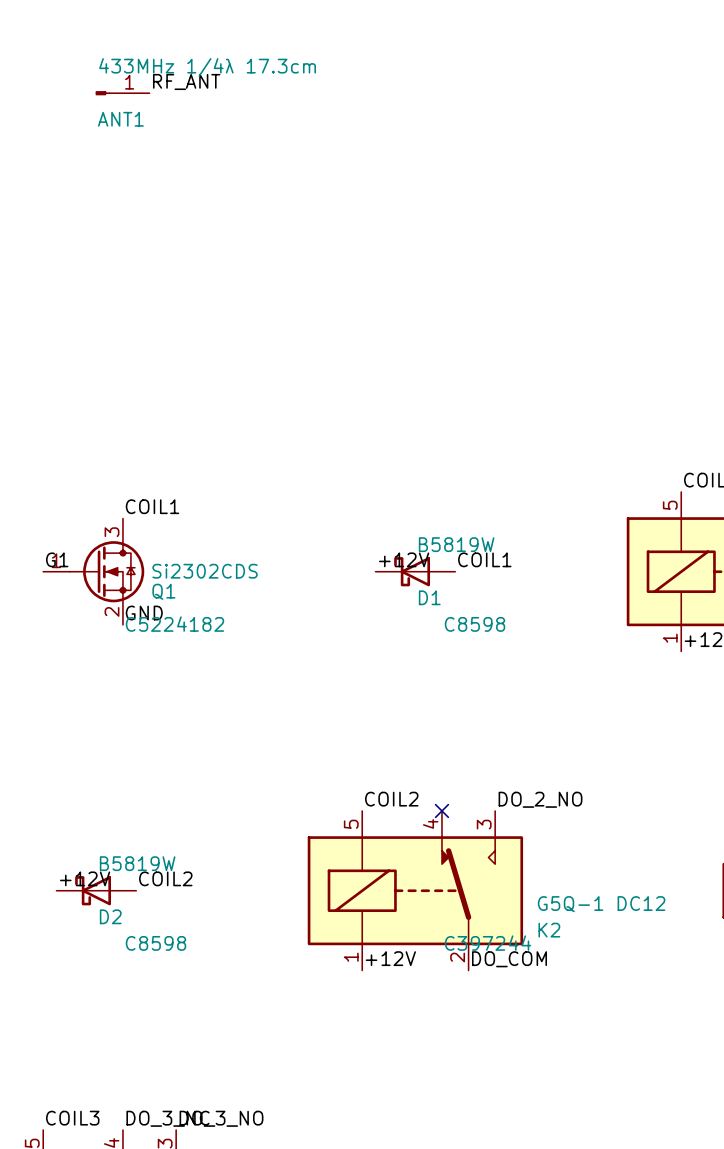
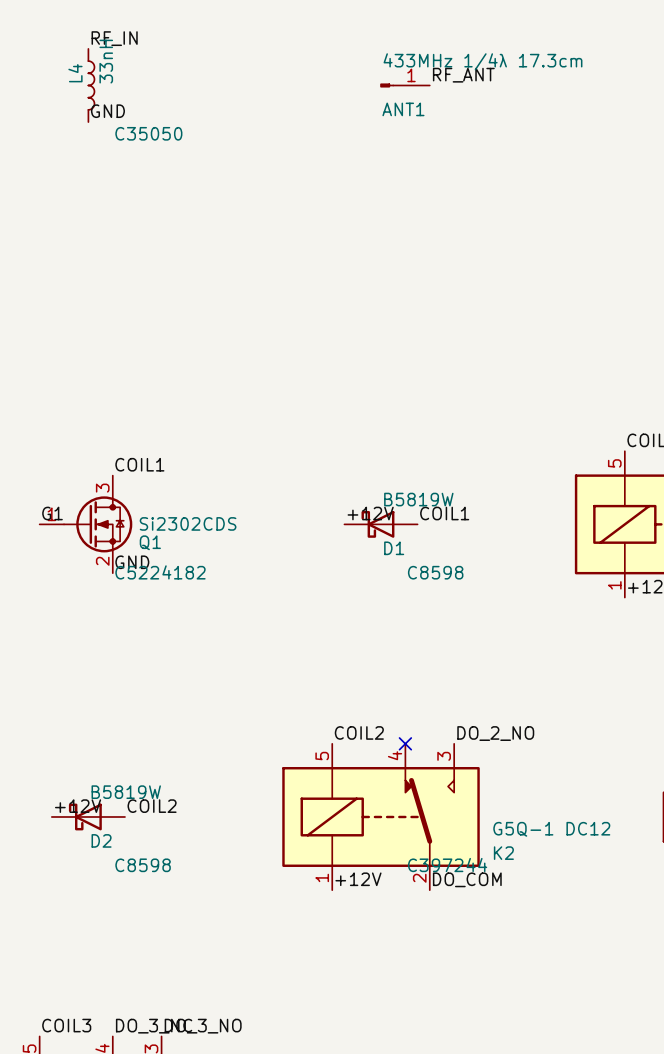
label: none -> RF_IN (114, 38)
label: RF_ANT (186, 81) -> none
label: none -> RF_ANT (463, 75)
L4: none -> 33nH (91, 85)
ANT1 position: (122, 93) -> (405, 85)
label: none -> GND (107, 111)

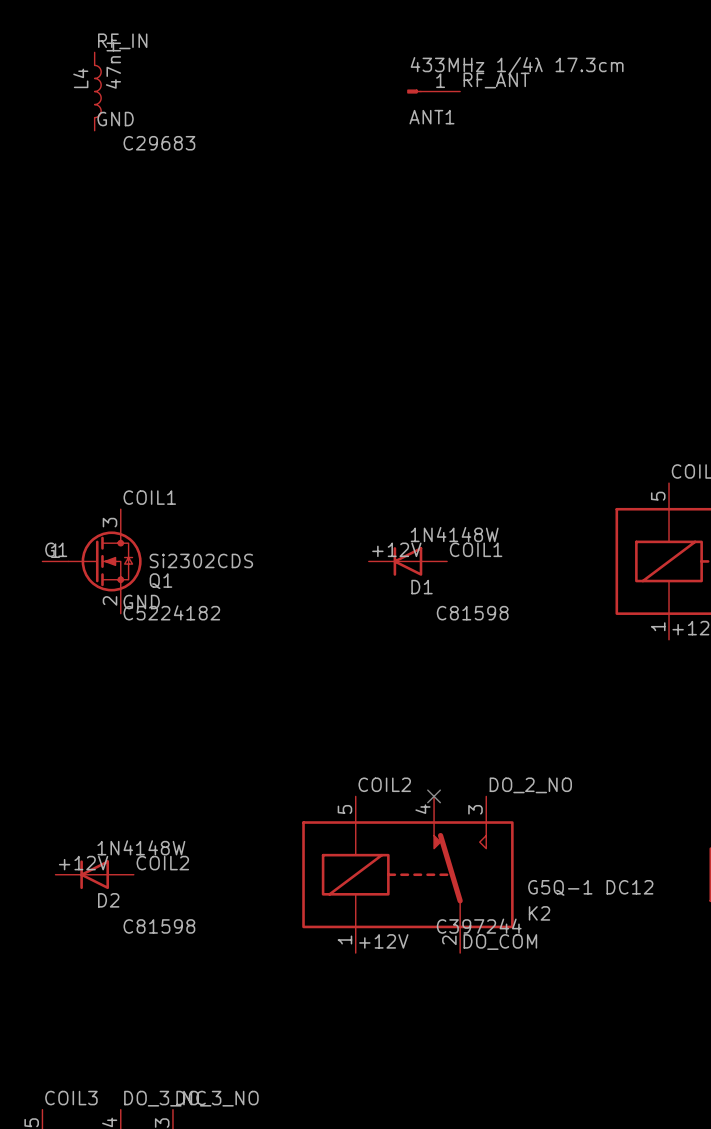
L4 value: 33nH (106, 61) -> 47nH (113, 65)
L4 text: C35050 (148, 133) -> C29683 (159, 143)
D1 value: B5819W (418, 499) -> 1N4148W (454, 534)
D1 symbol: [344, 510, 418, 538] -> [368, 547, 448, 576]
D1 text: C8598 (435, 572) -> C81598 (472, 613)
D2 value: B5819W (126, 792) -> 1N4148W (141, 847)
D2 symbol: [51, 803, 125, 831] -> [55, 860, 134, 890]
D2 text: C8598 (143, 865) -> C81598 (159, 926)

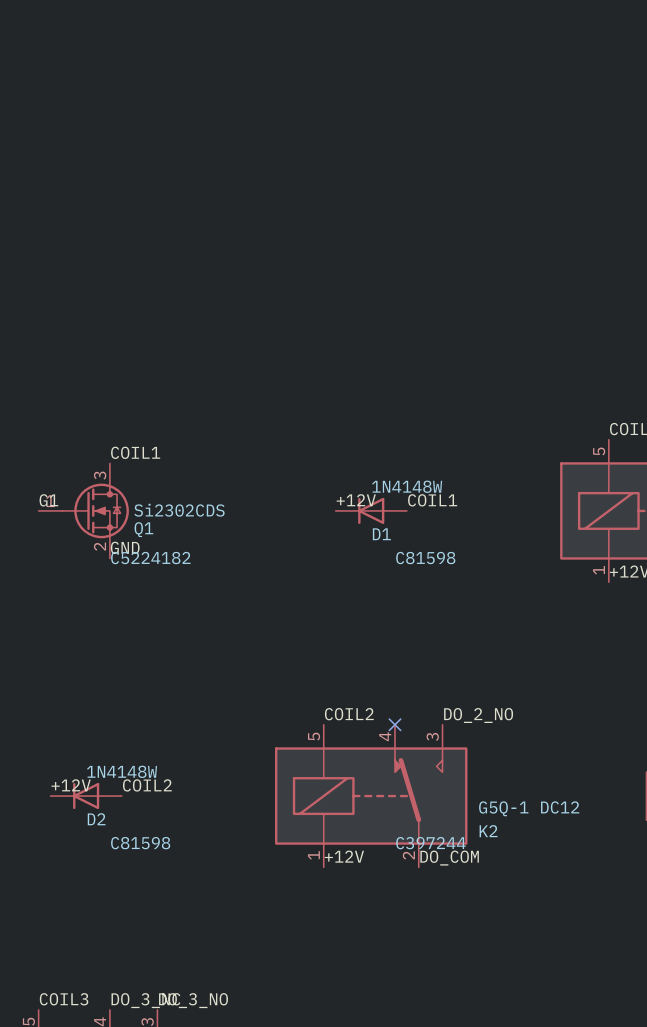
label: RF_IN (122, 41) -> none
label: RF_ANT (496, 80) -> none
L4: 47nH (97, 91) -> none
ANT1: 433MHz 1/4λ 17.3cm (433, 91) -> none
label: GND (115, 119) -> none

